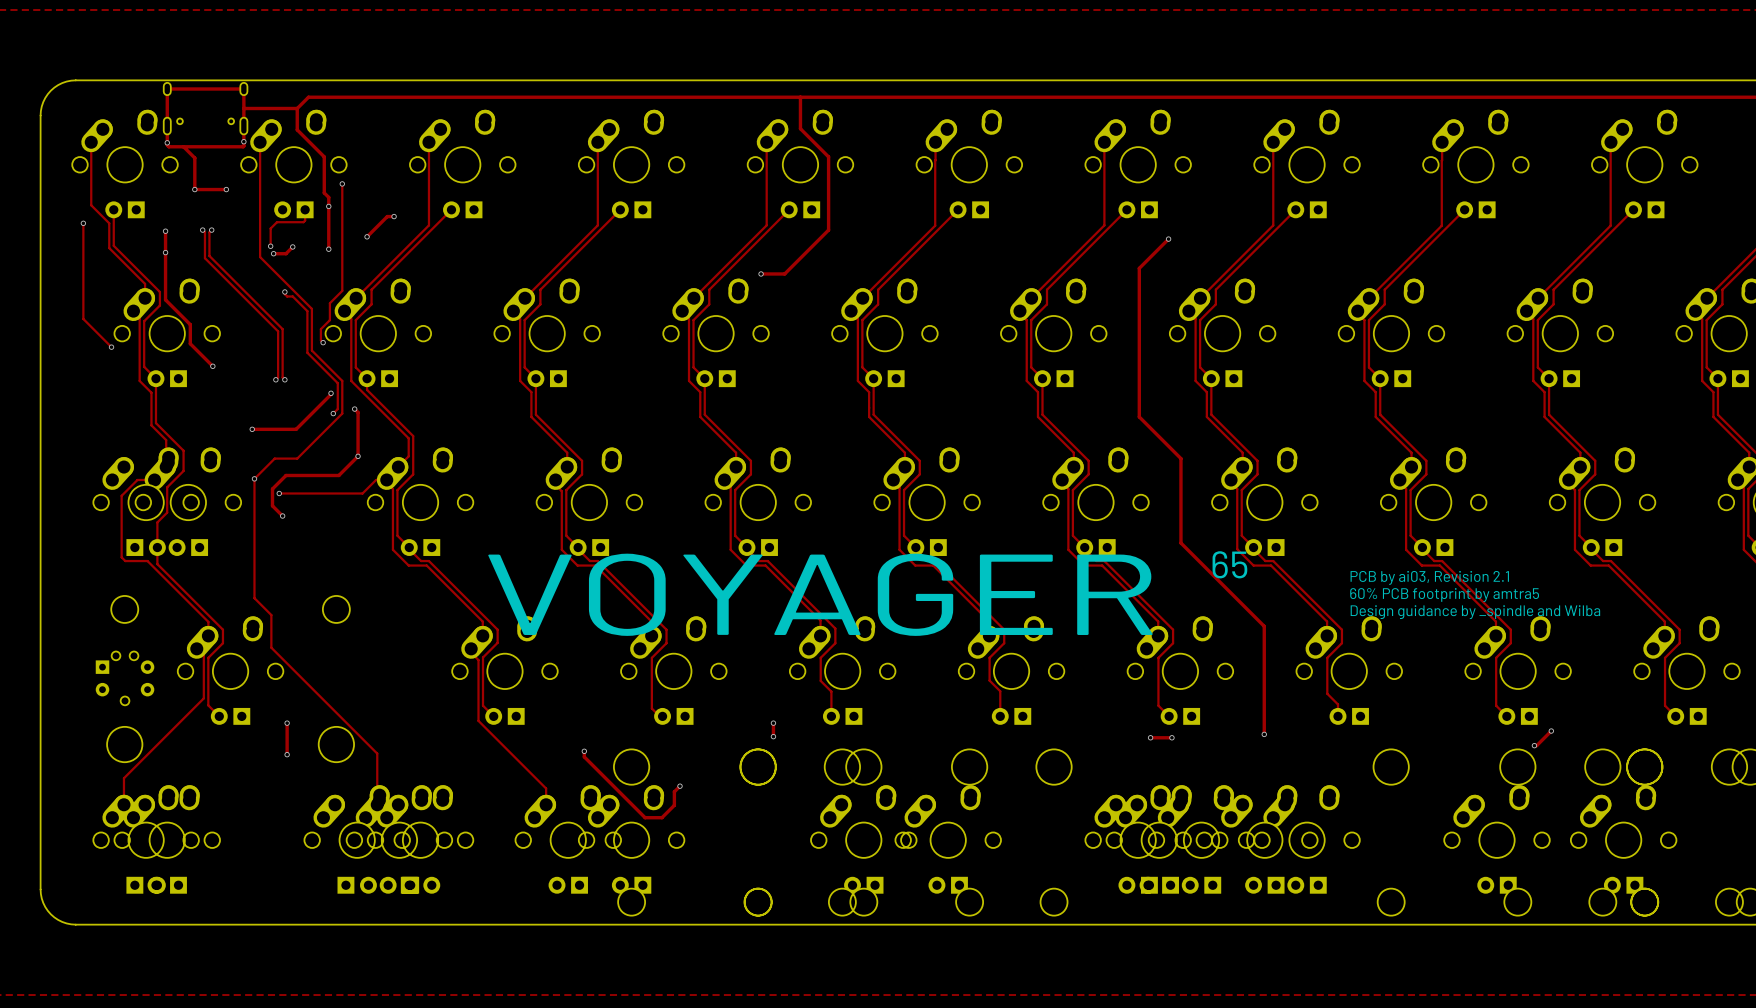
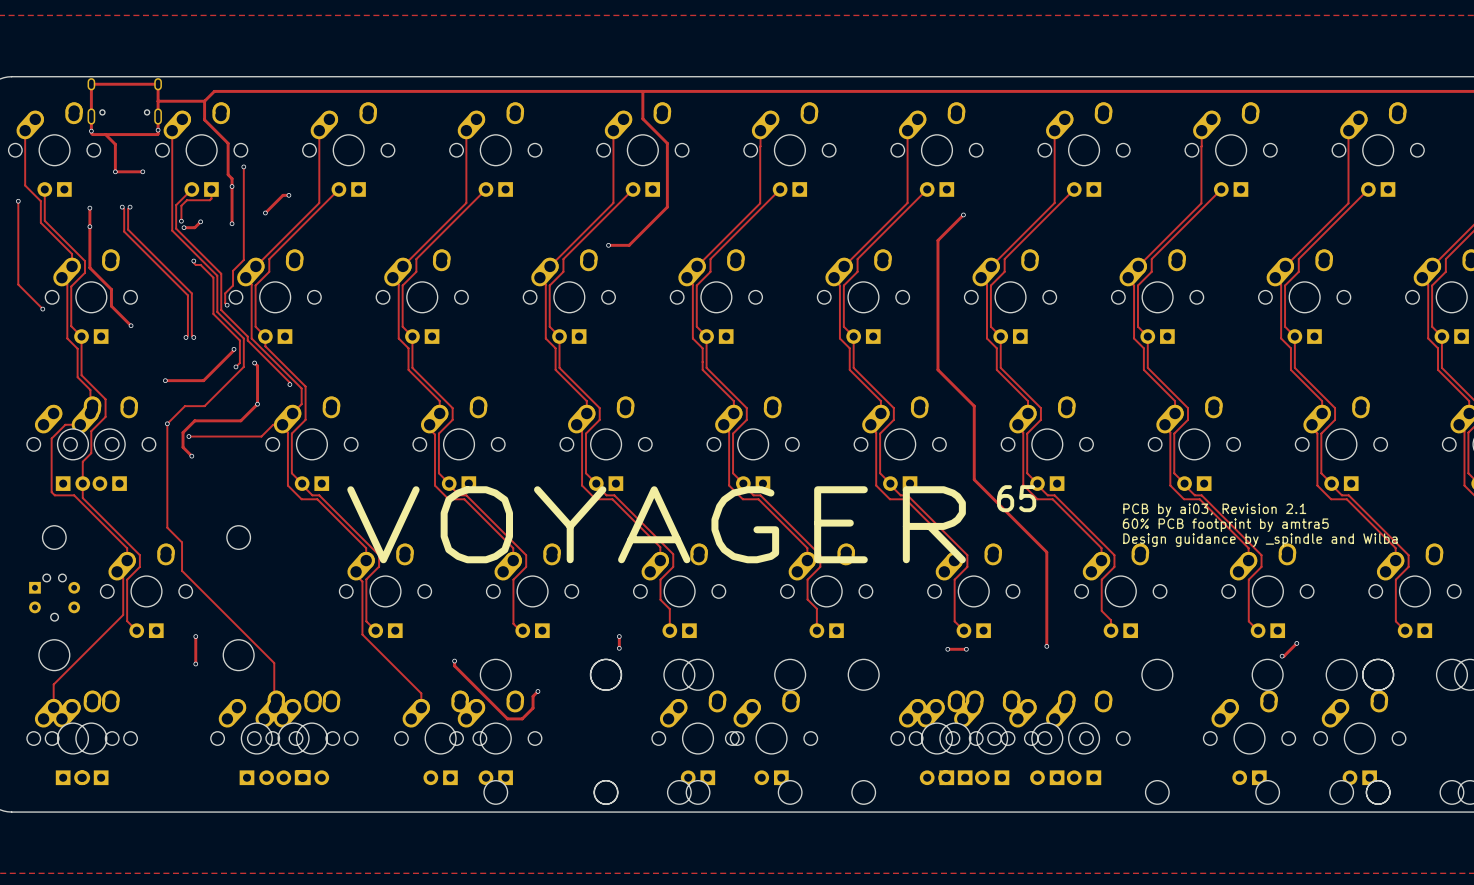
track: none -> (191, 189) (176, 205) (176, 228) (221, 273) (221, 310) (247, 336) (247, 340) (289, 384)
via: none -> (289, 384)

